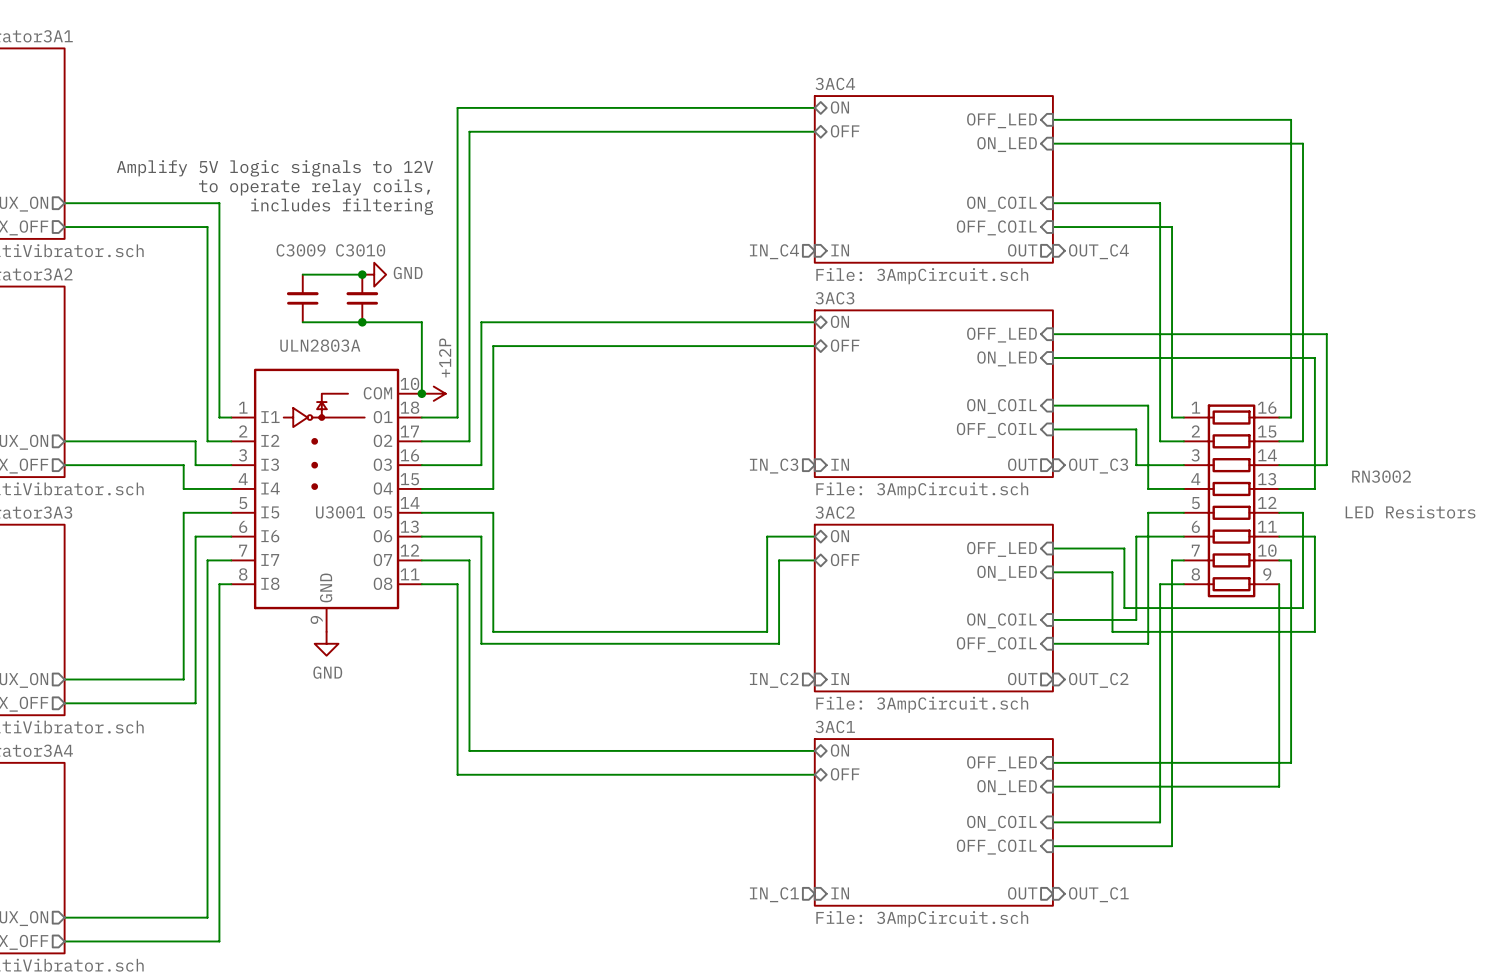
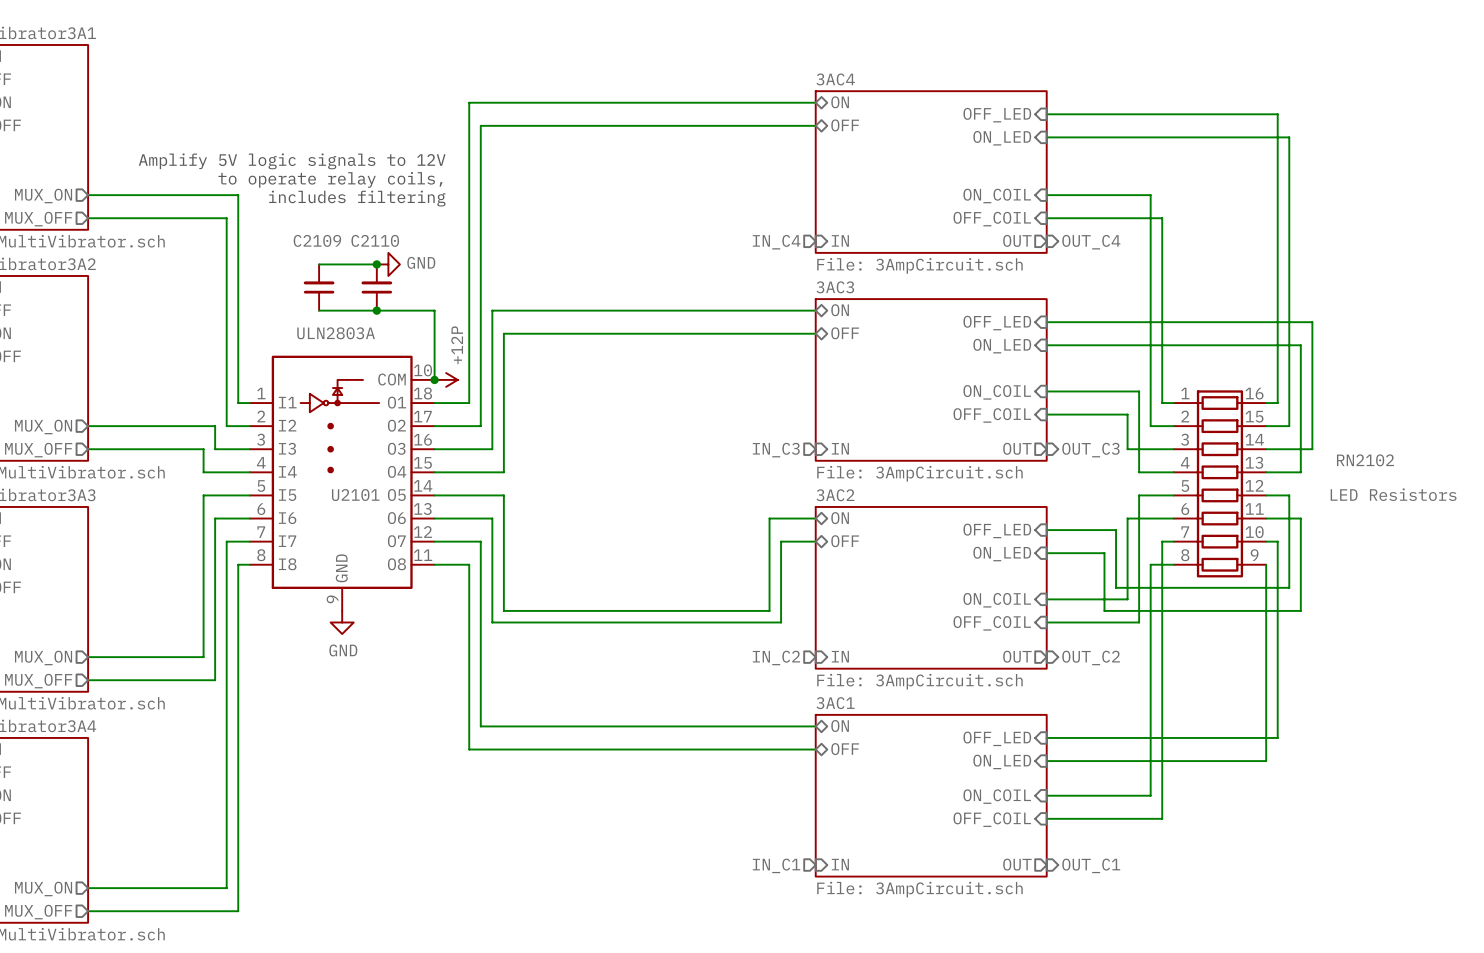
C3009 name: C3009 (301, 250) -> C2109 (317, 240)
C3010 name: C3010 (360, 250) -> C2110 (375, 240)
RN3002 name: RN3002 (1381, 476) -> RN2102 (1365, 460)
U3001 name: U3001 (340, 512) -> U2101 (355, 495)

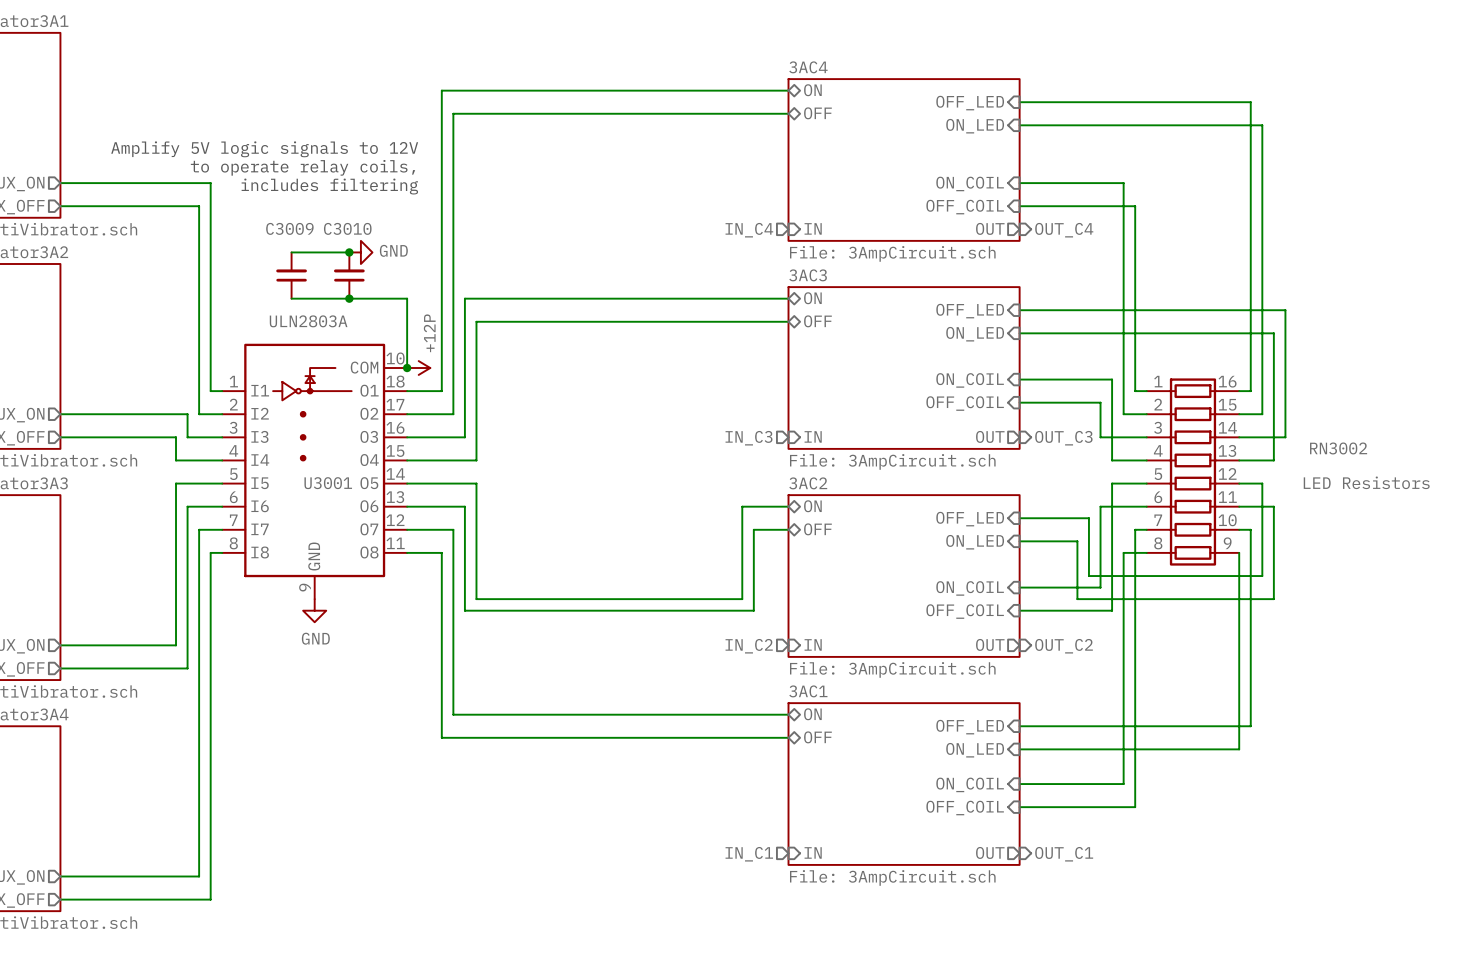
C2109 name: C2109 (317, 240) -> C3009 (289, 228)
C2110 name: C2110 (375, 240) -> C3010 (347, 228)
RN2102 name: RN2102 (1365, 460) -> RN3002 (1338, 448)
U2101 name: U2101 (355, 495) -> U3001 (328, 483)

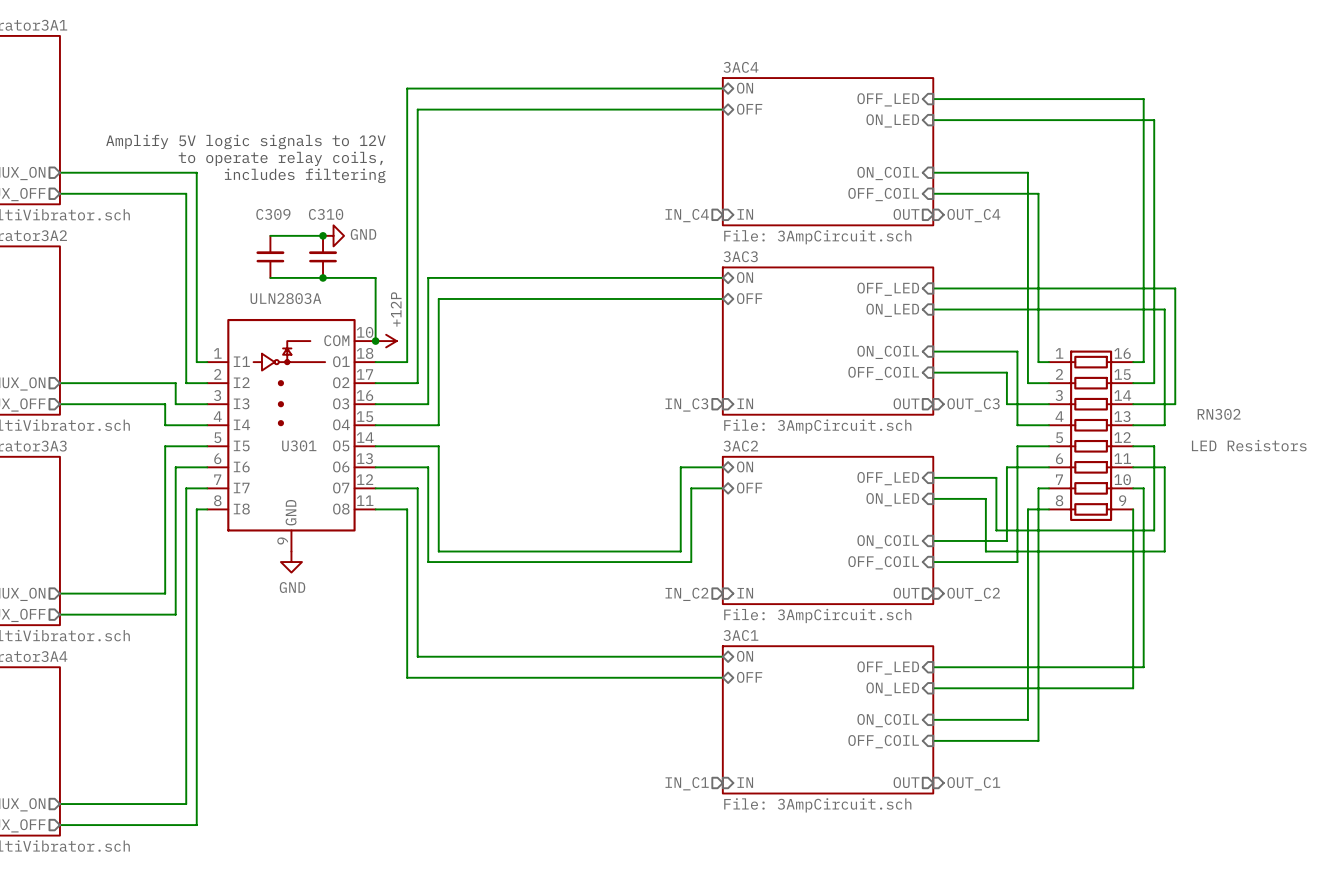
C3009 name: C3009 (289, 228) -> C309 (273, 214)
C3010 name: C3010 (347, 228) -> C310 (326, 214)
RN3002 name: RN3002 (1338, 448) -> RN302 (1219, 414)
U3001 name: U3001 (328, 483) -> U301 (299, 445)

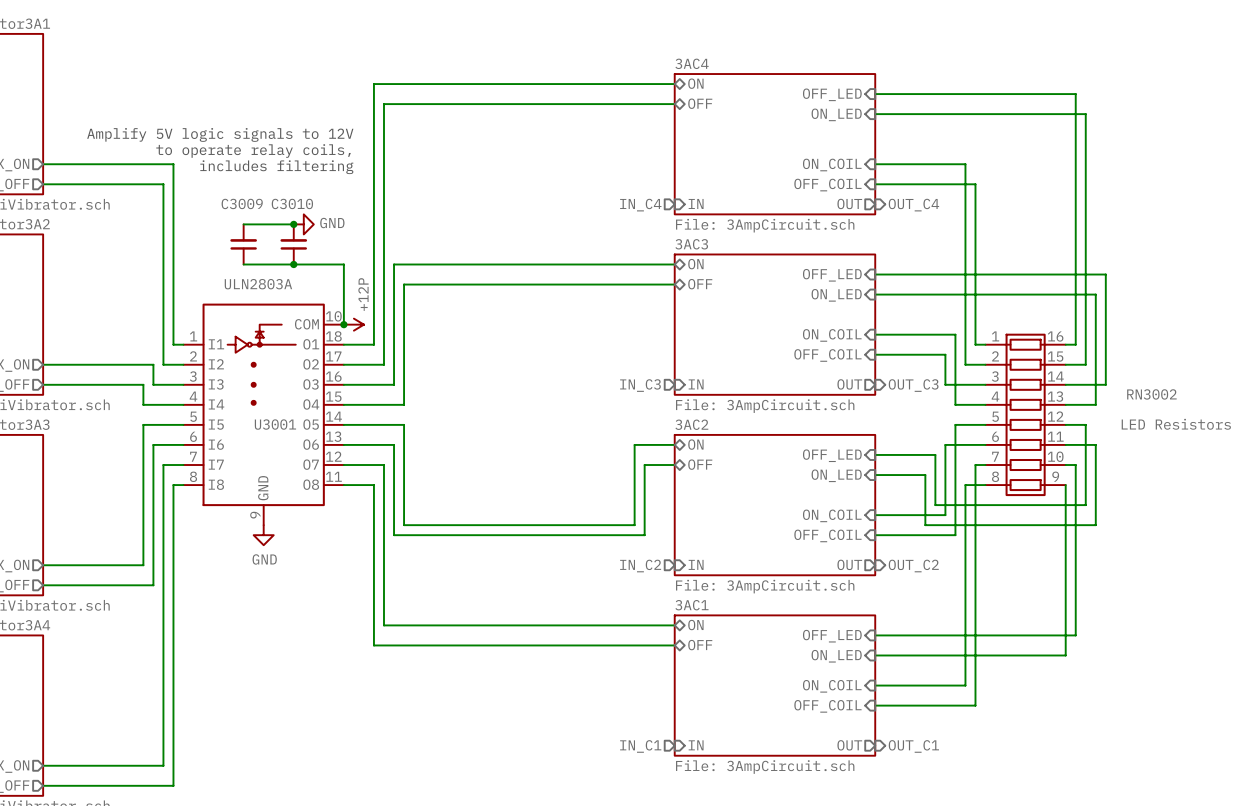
C309 name: C309 (273, 214) -> C3009 (242, 203)
C310 name: C310 (326, 214) -> C3010 (292, 203)
RN302 name: RN302 (1219, 414) -> RN3002 (1151, 394)
U301 name: U301 (299, 445) -> U3001 (275, 424)

